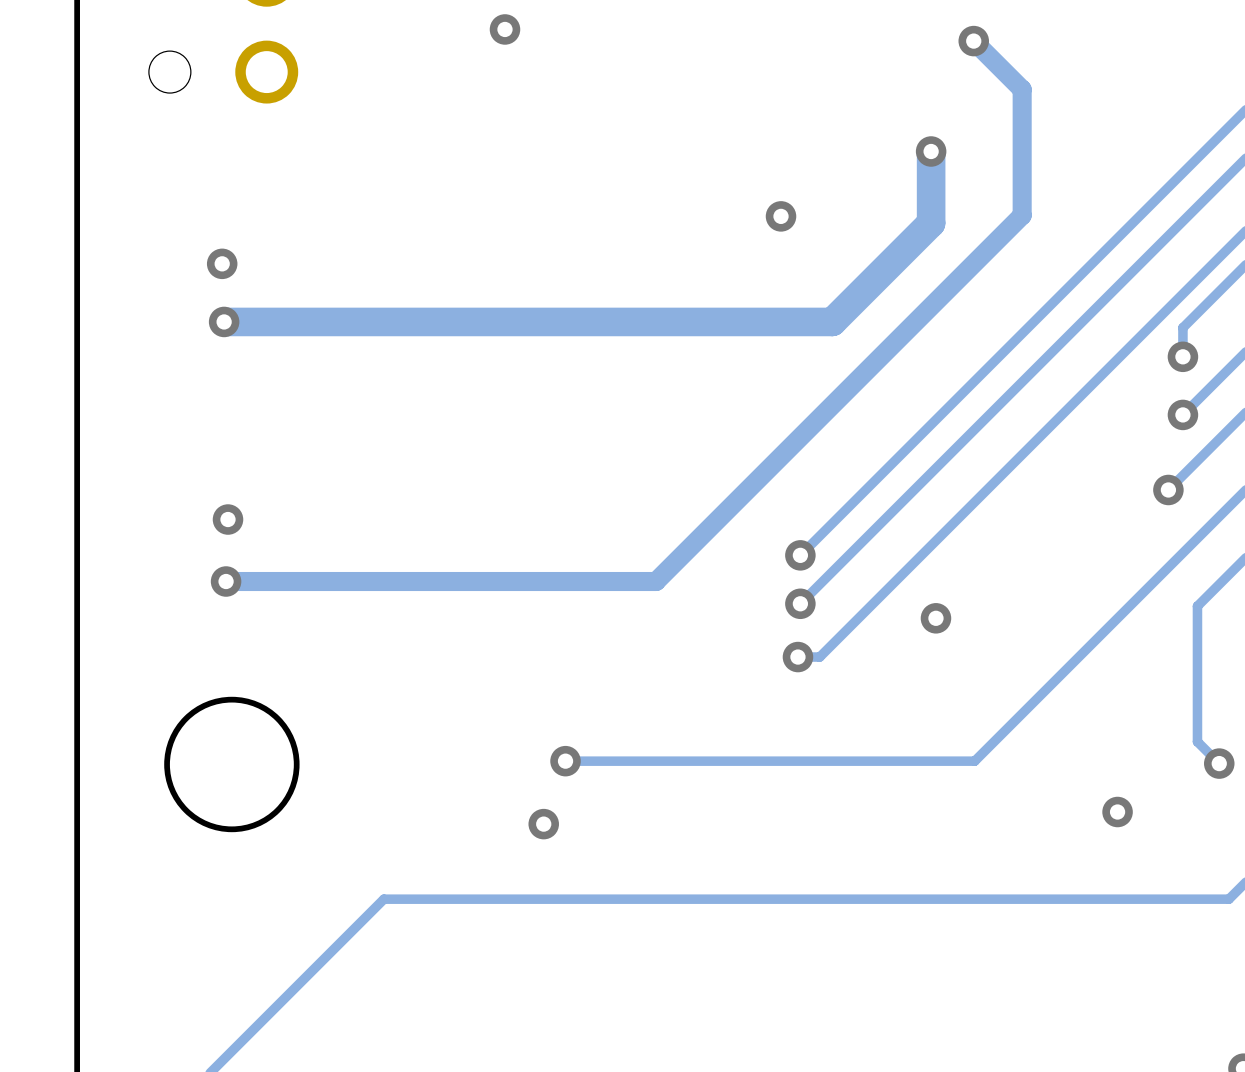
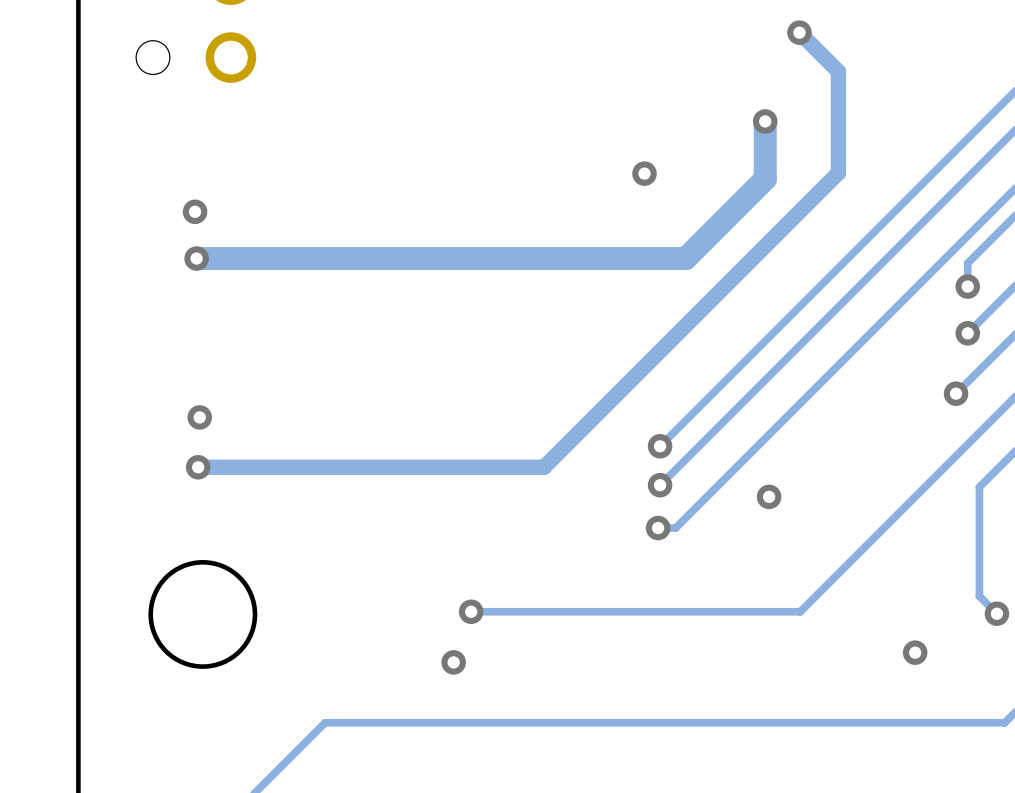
via: (504, 29) -> none

